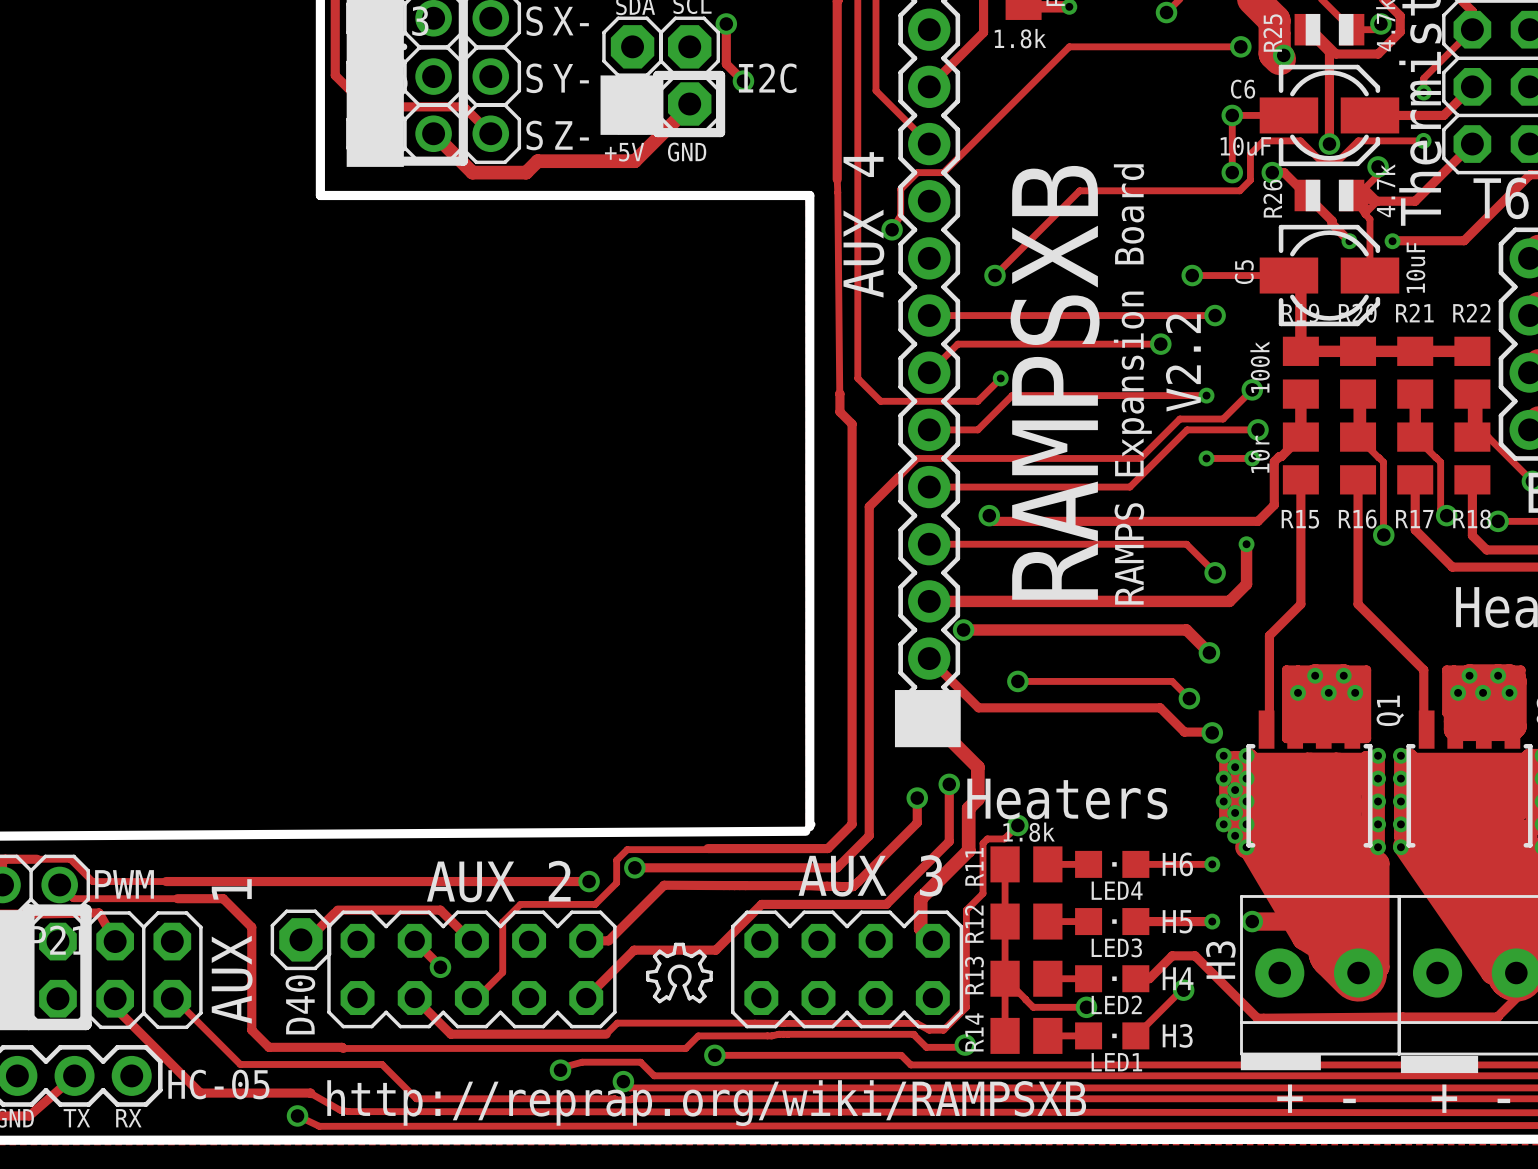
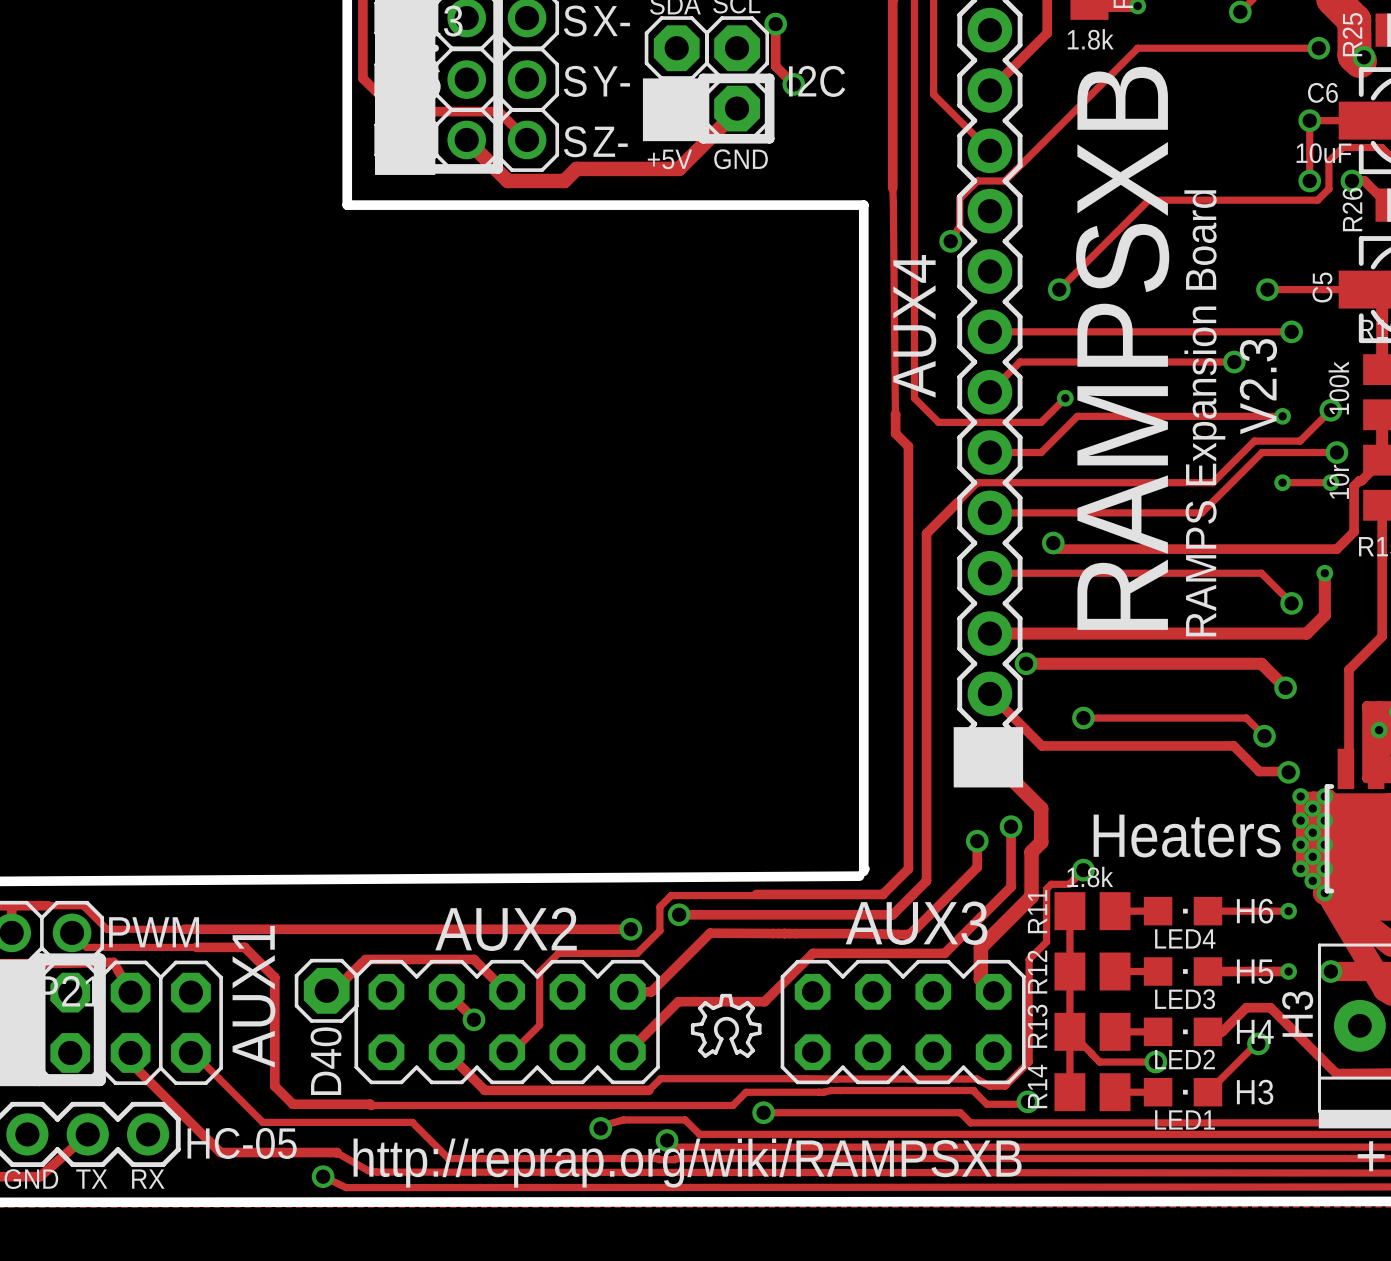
text: AUX 4 (863, 224) -> AUX4 (914, 326)
text: V2.2 (1183, 362) -> V2.3 (1258, 386)
text position: Heaters (1067, 799) -> Heaters (1187, 836)
text: AUX 3 (870, 875) -> AUX3 (916, 923)
text: AUX 2 (498, 881) -> AUX2 (506, 929)
text: AUX 1 (232, 951) -> AUX1 (254, 996)

